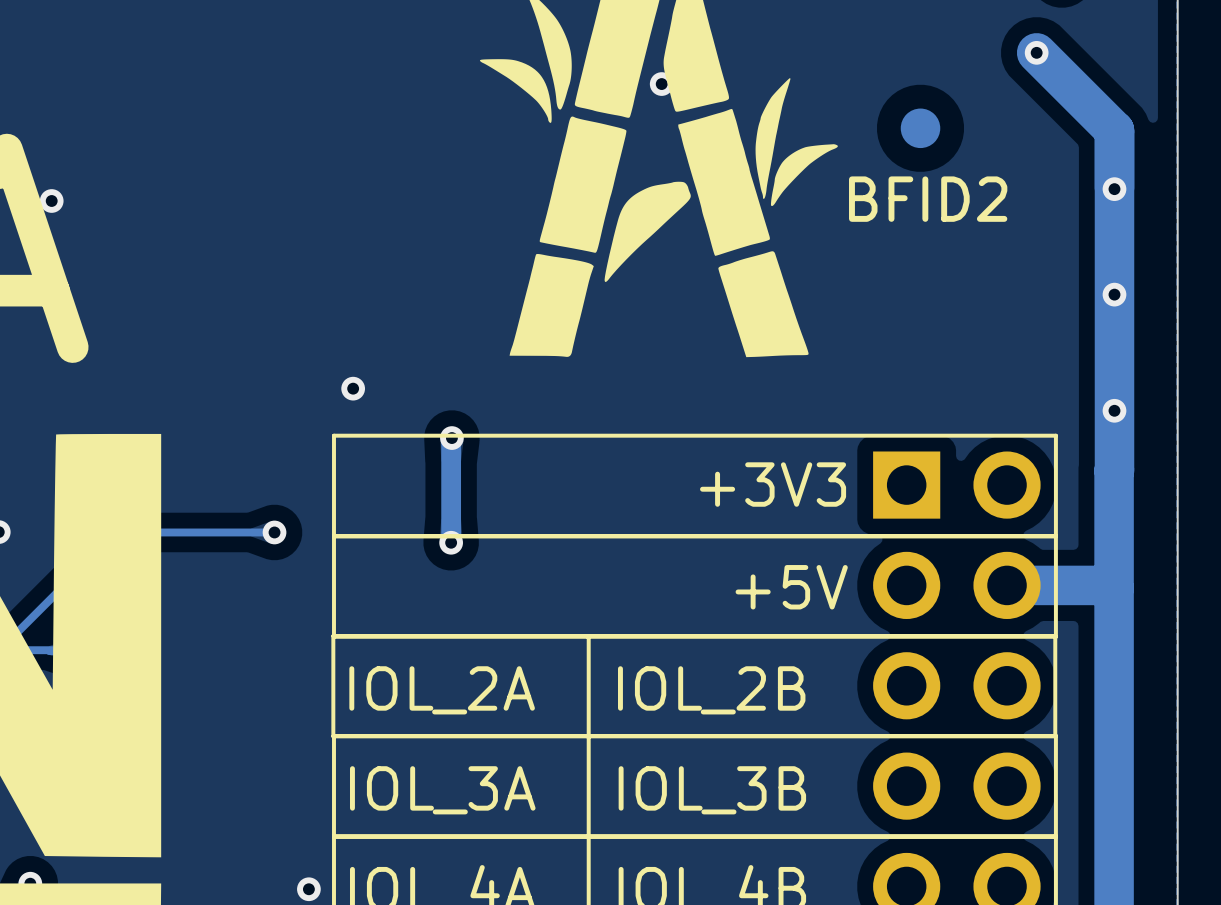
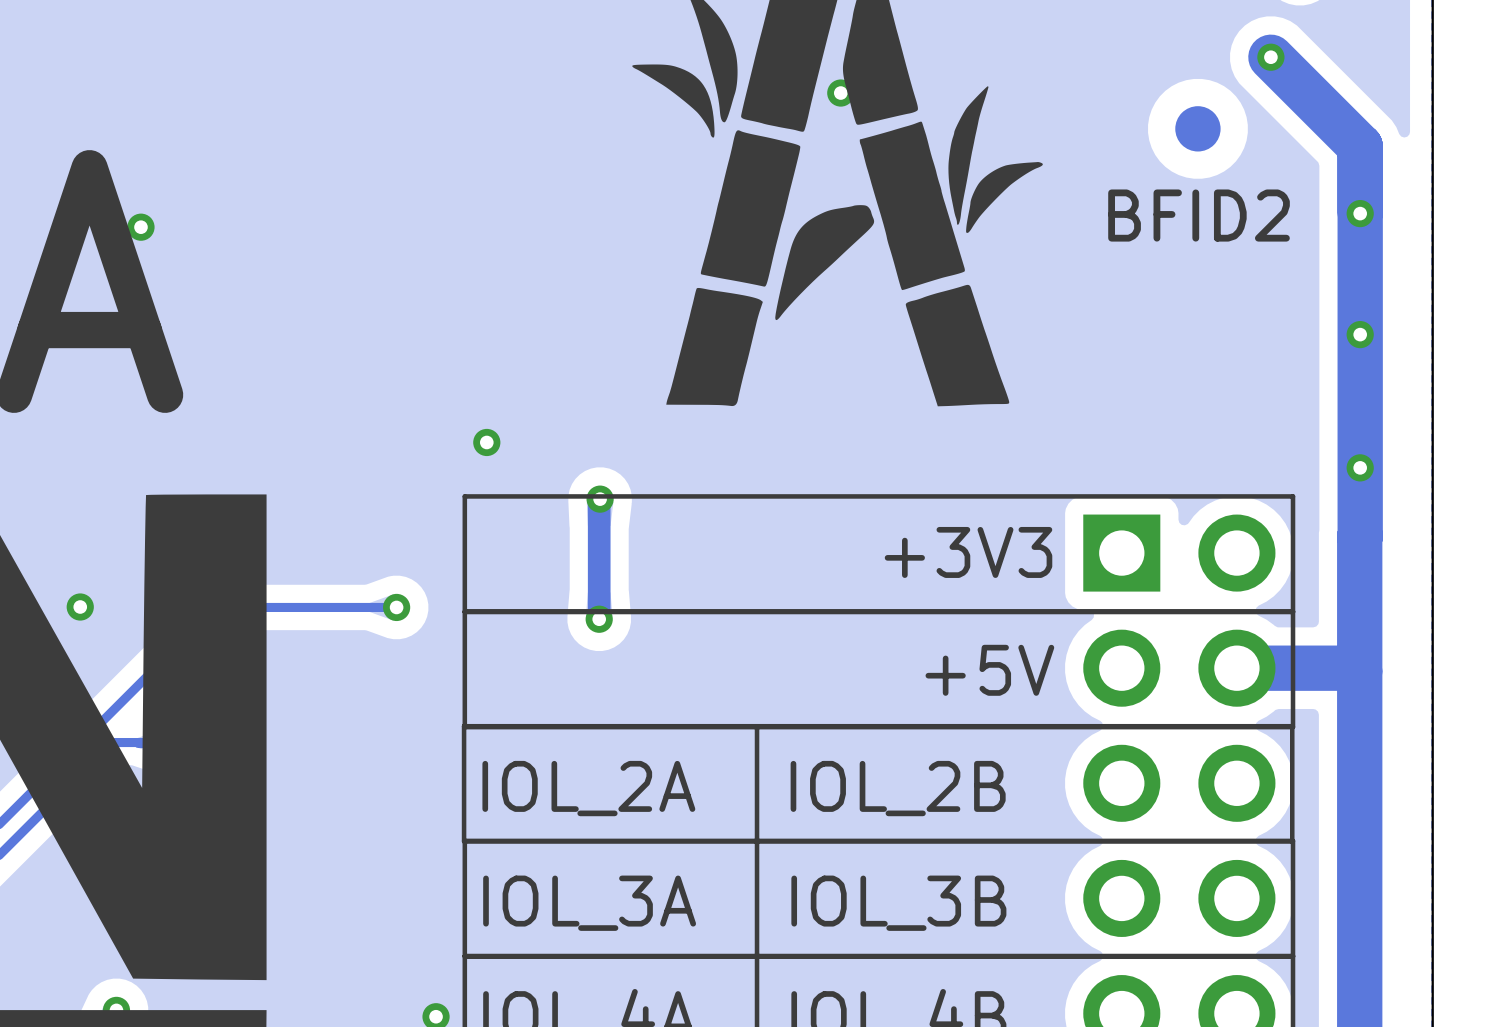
BFID2 position: (920, 128) -> (1197, 128)
BFID2 name position: BFID2 (928, 199) -> BFID2 (1199, 215)

